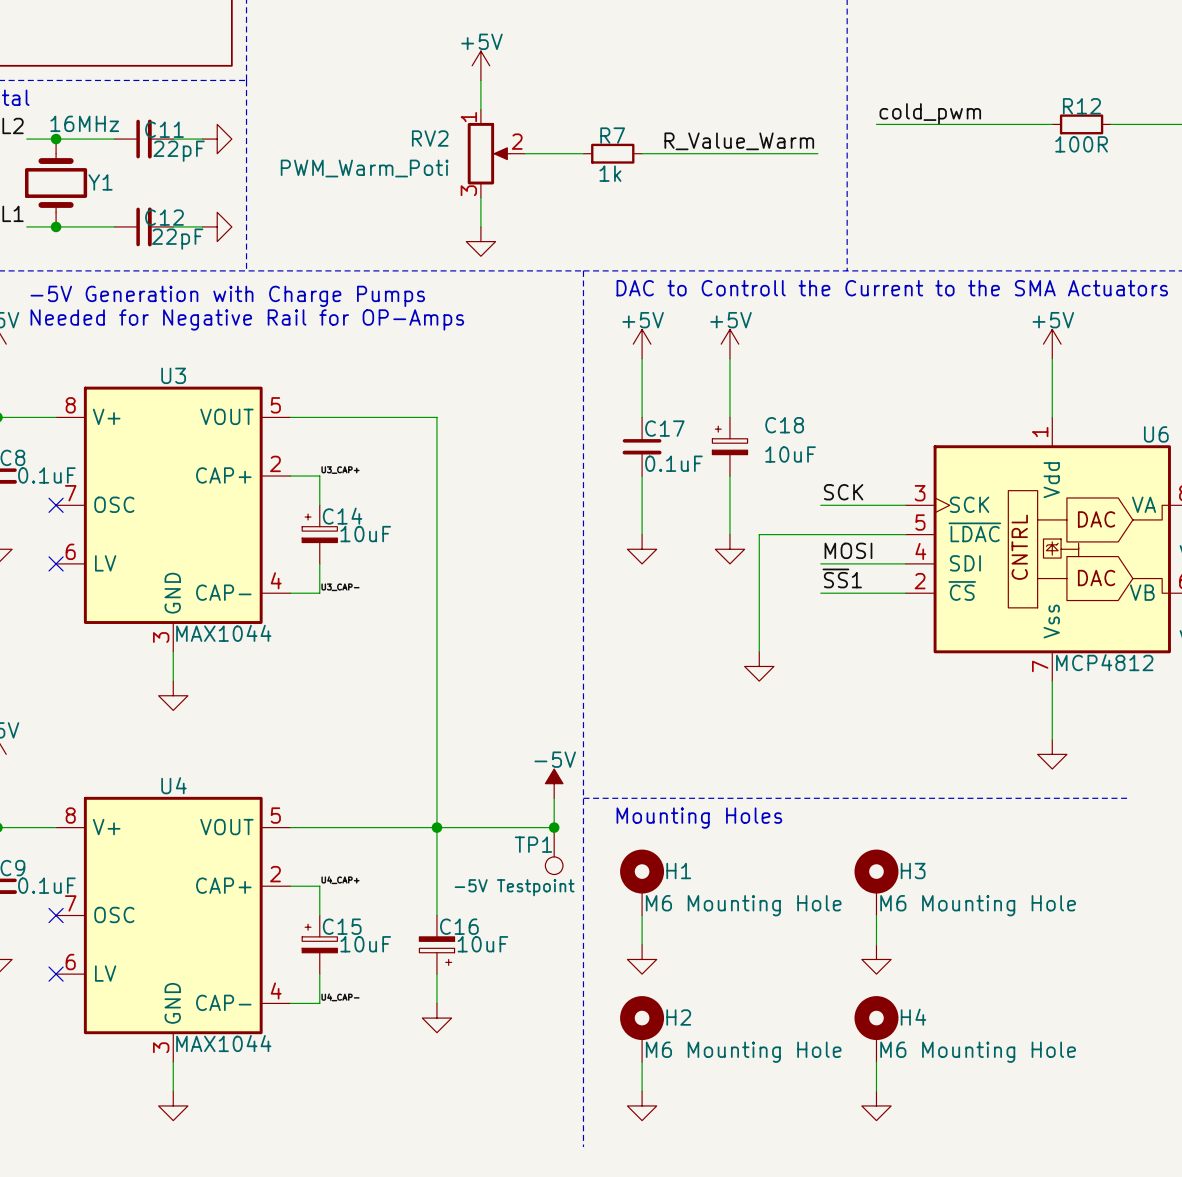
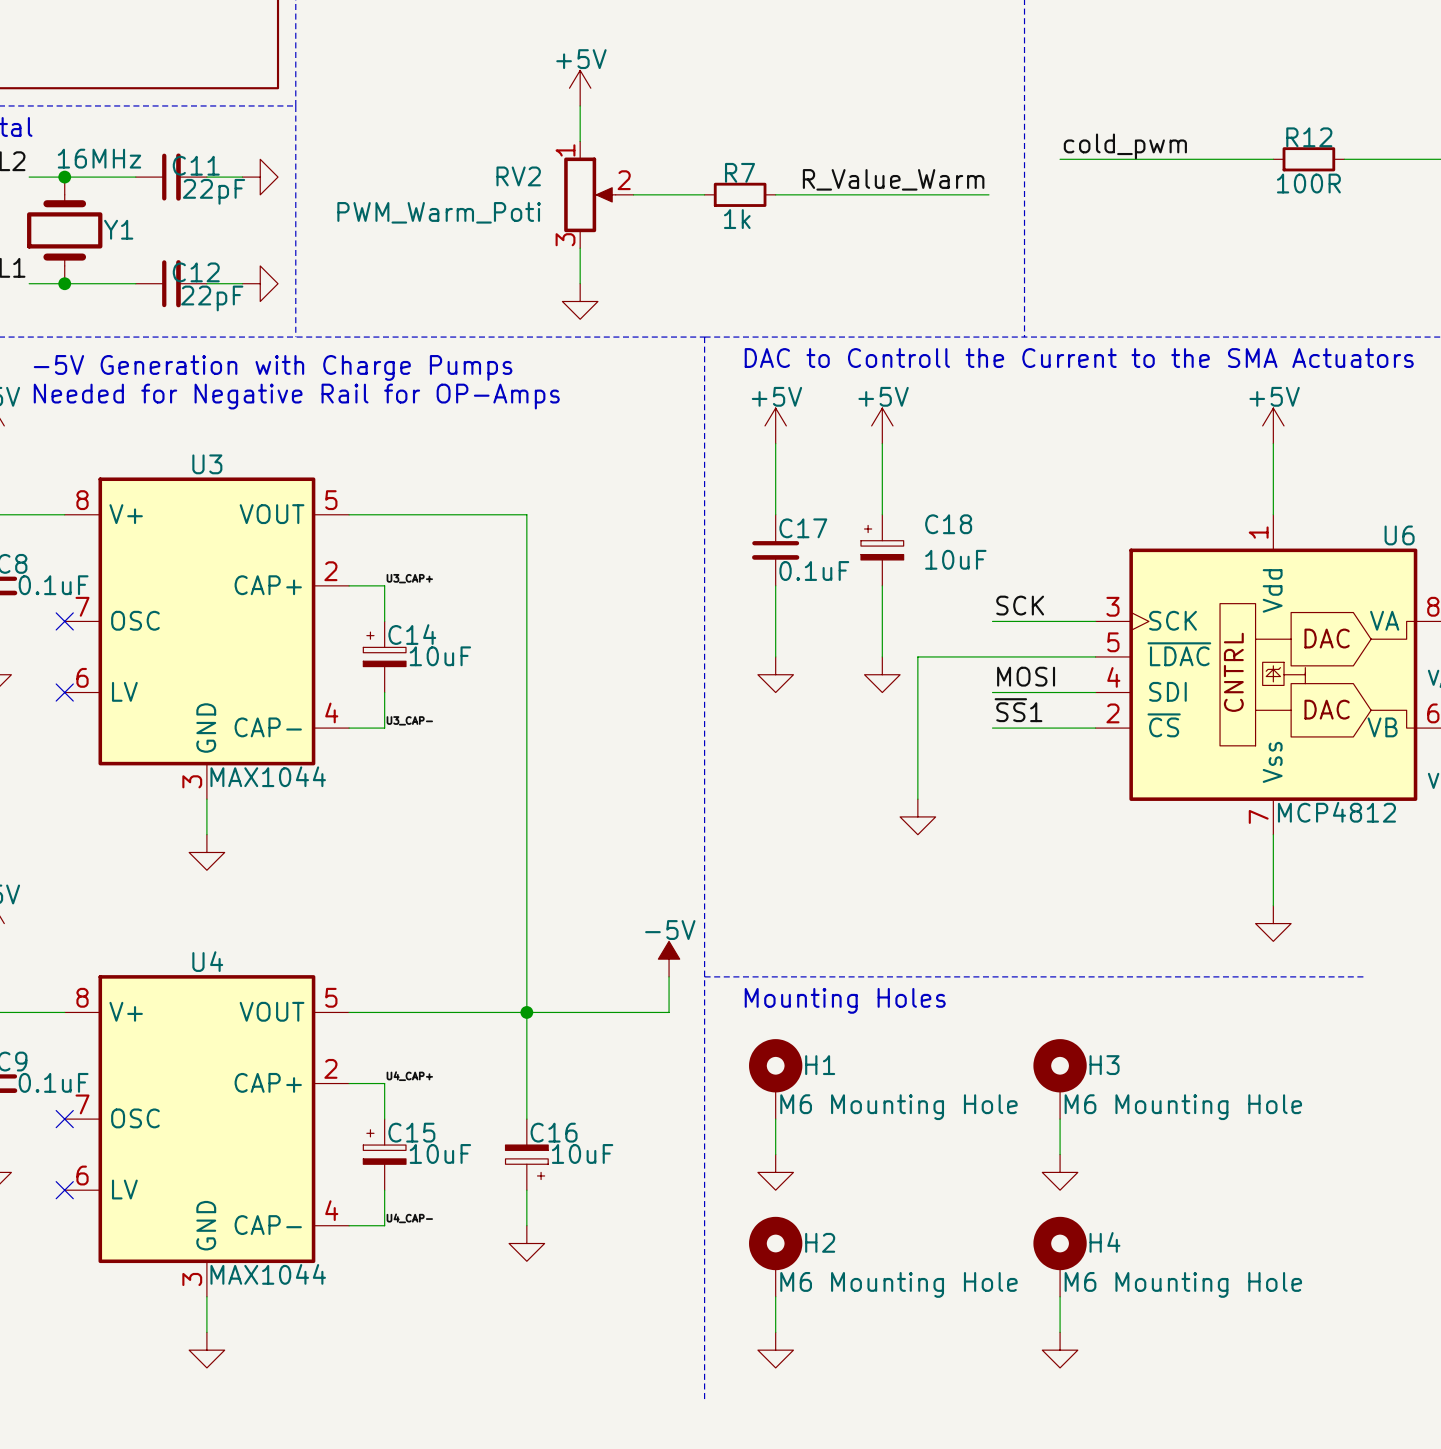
junction: (554, 827) -> none
TP1: -5V Testpoint (554, 851) -> none

